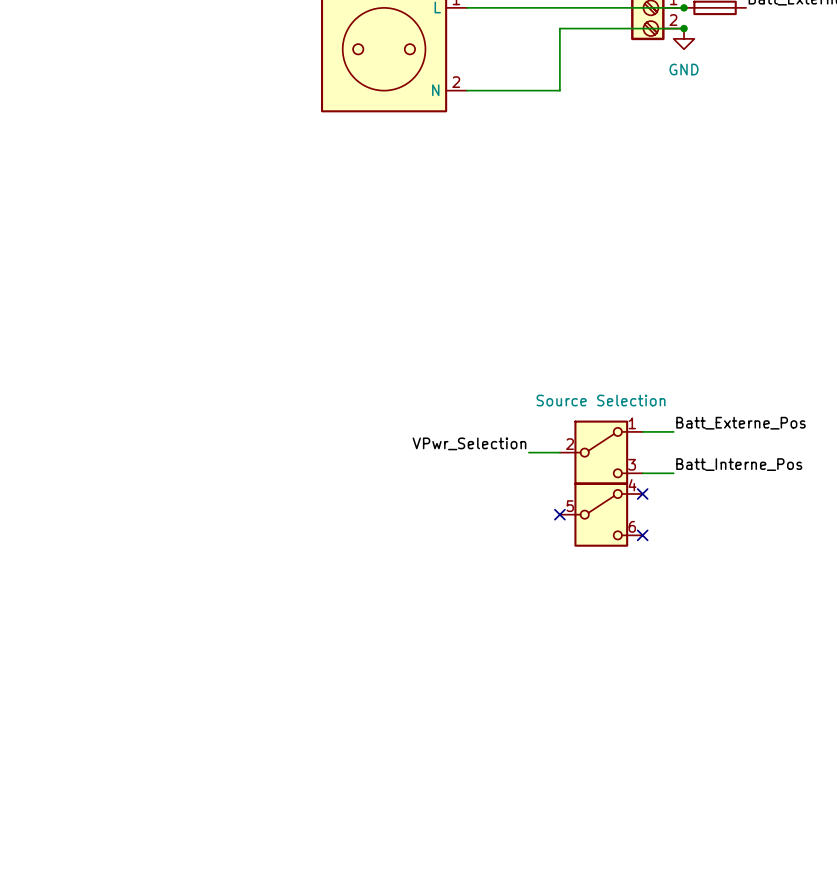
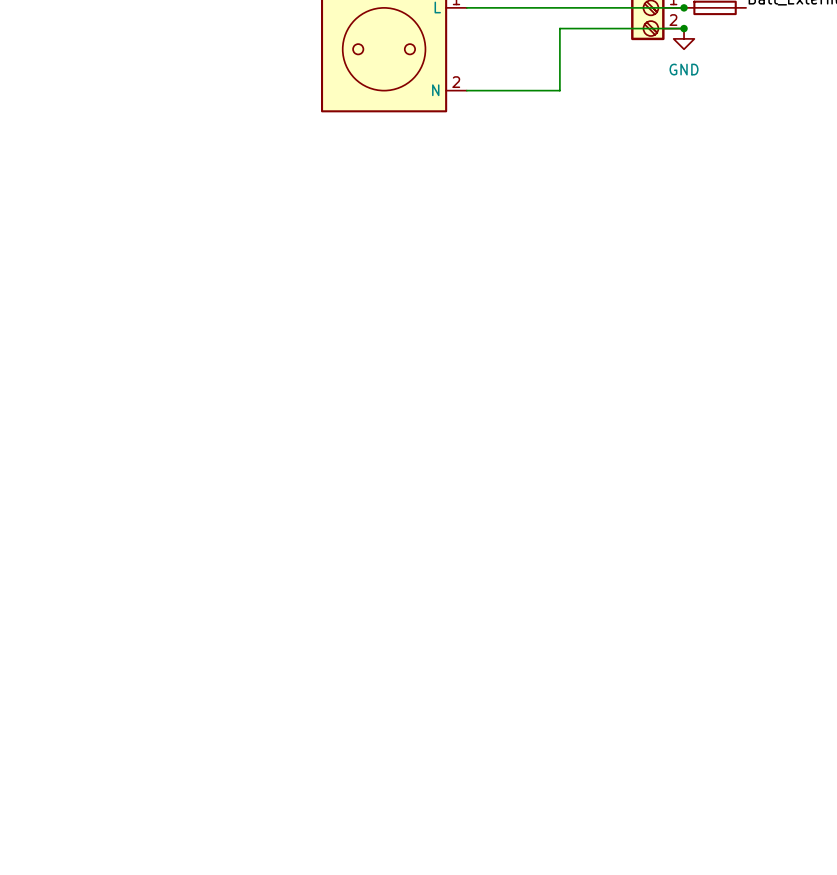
label: Batt_Externe_Pos (740, 423) -> none
wire: (642, 431) (673, 431) -> none
label: VPwr_Selection (469, 443) -> none
wire: (528, 452) (559, 452) -> none
part: (601, 452) -> none
label: Batt_Interne_Pos (739, 464) -> none
wire: (642, 473) (673, 473) -> none
no-connect mark: (642, 493) -> none
no-connect mark: (559, 514) -> none
part: (601, 514) -> none
no-connect mark: (642, 535) -> none

